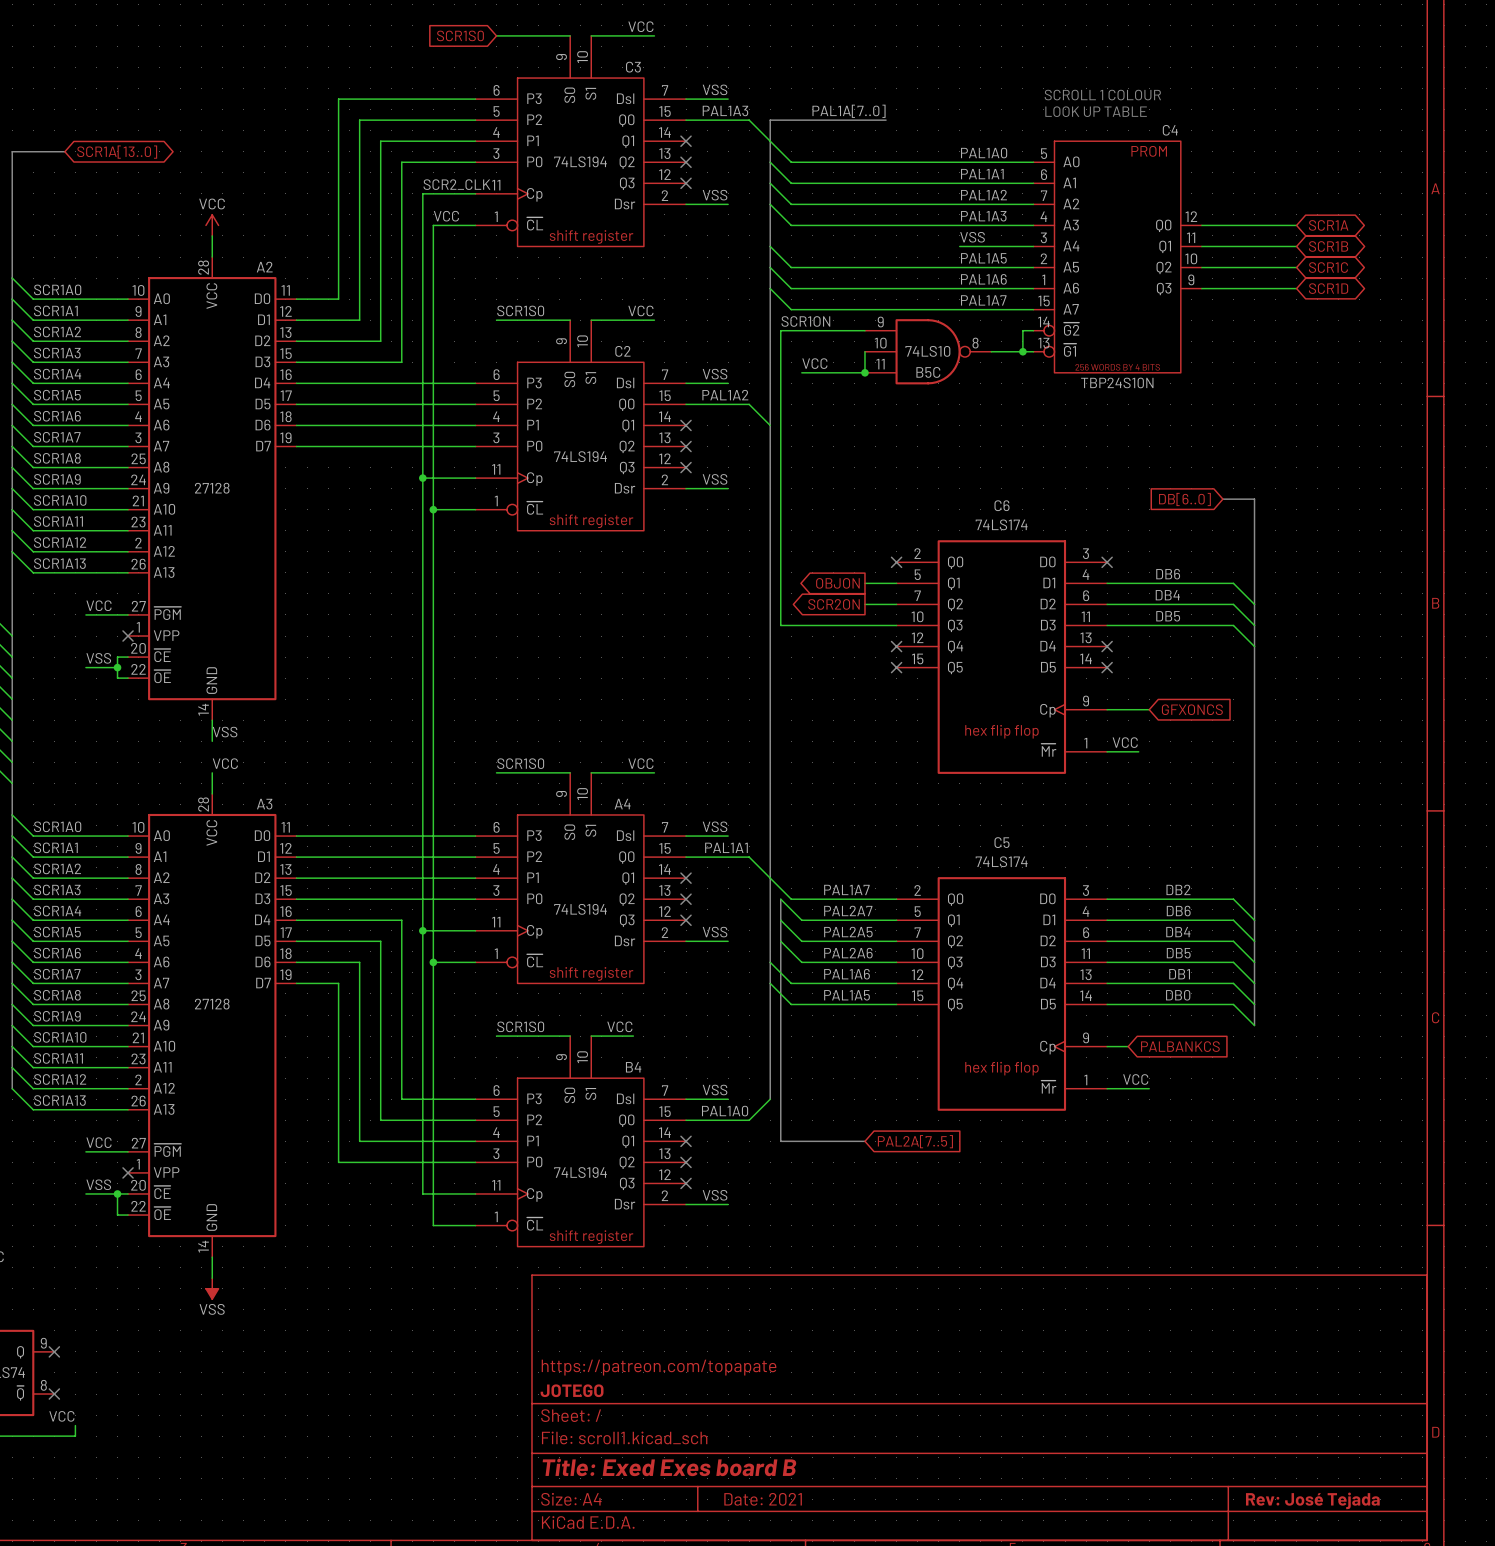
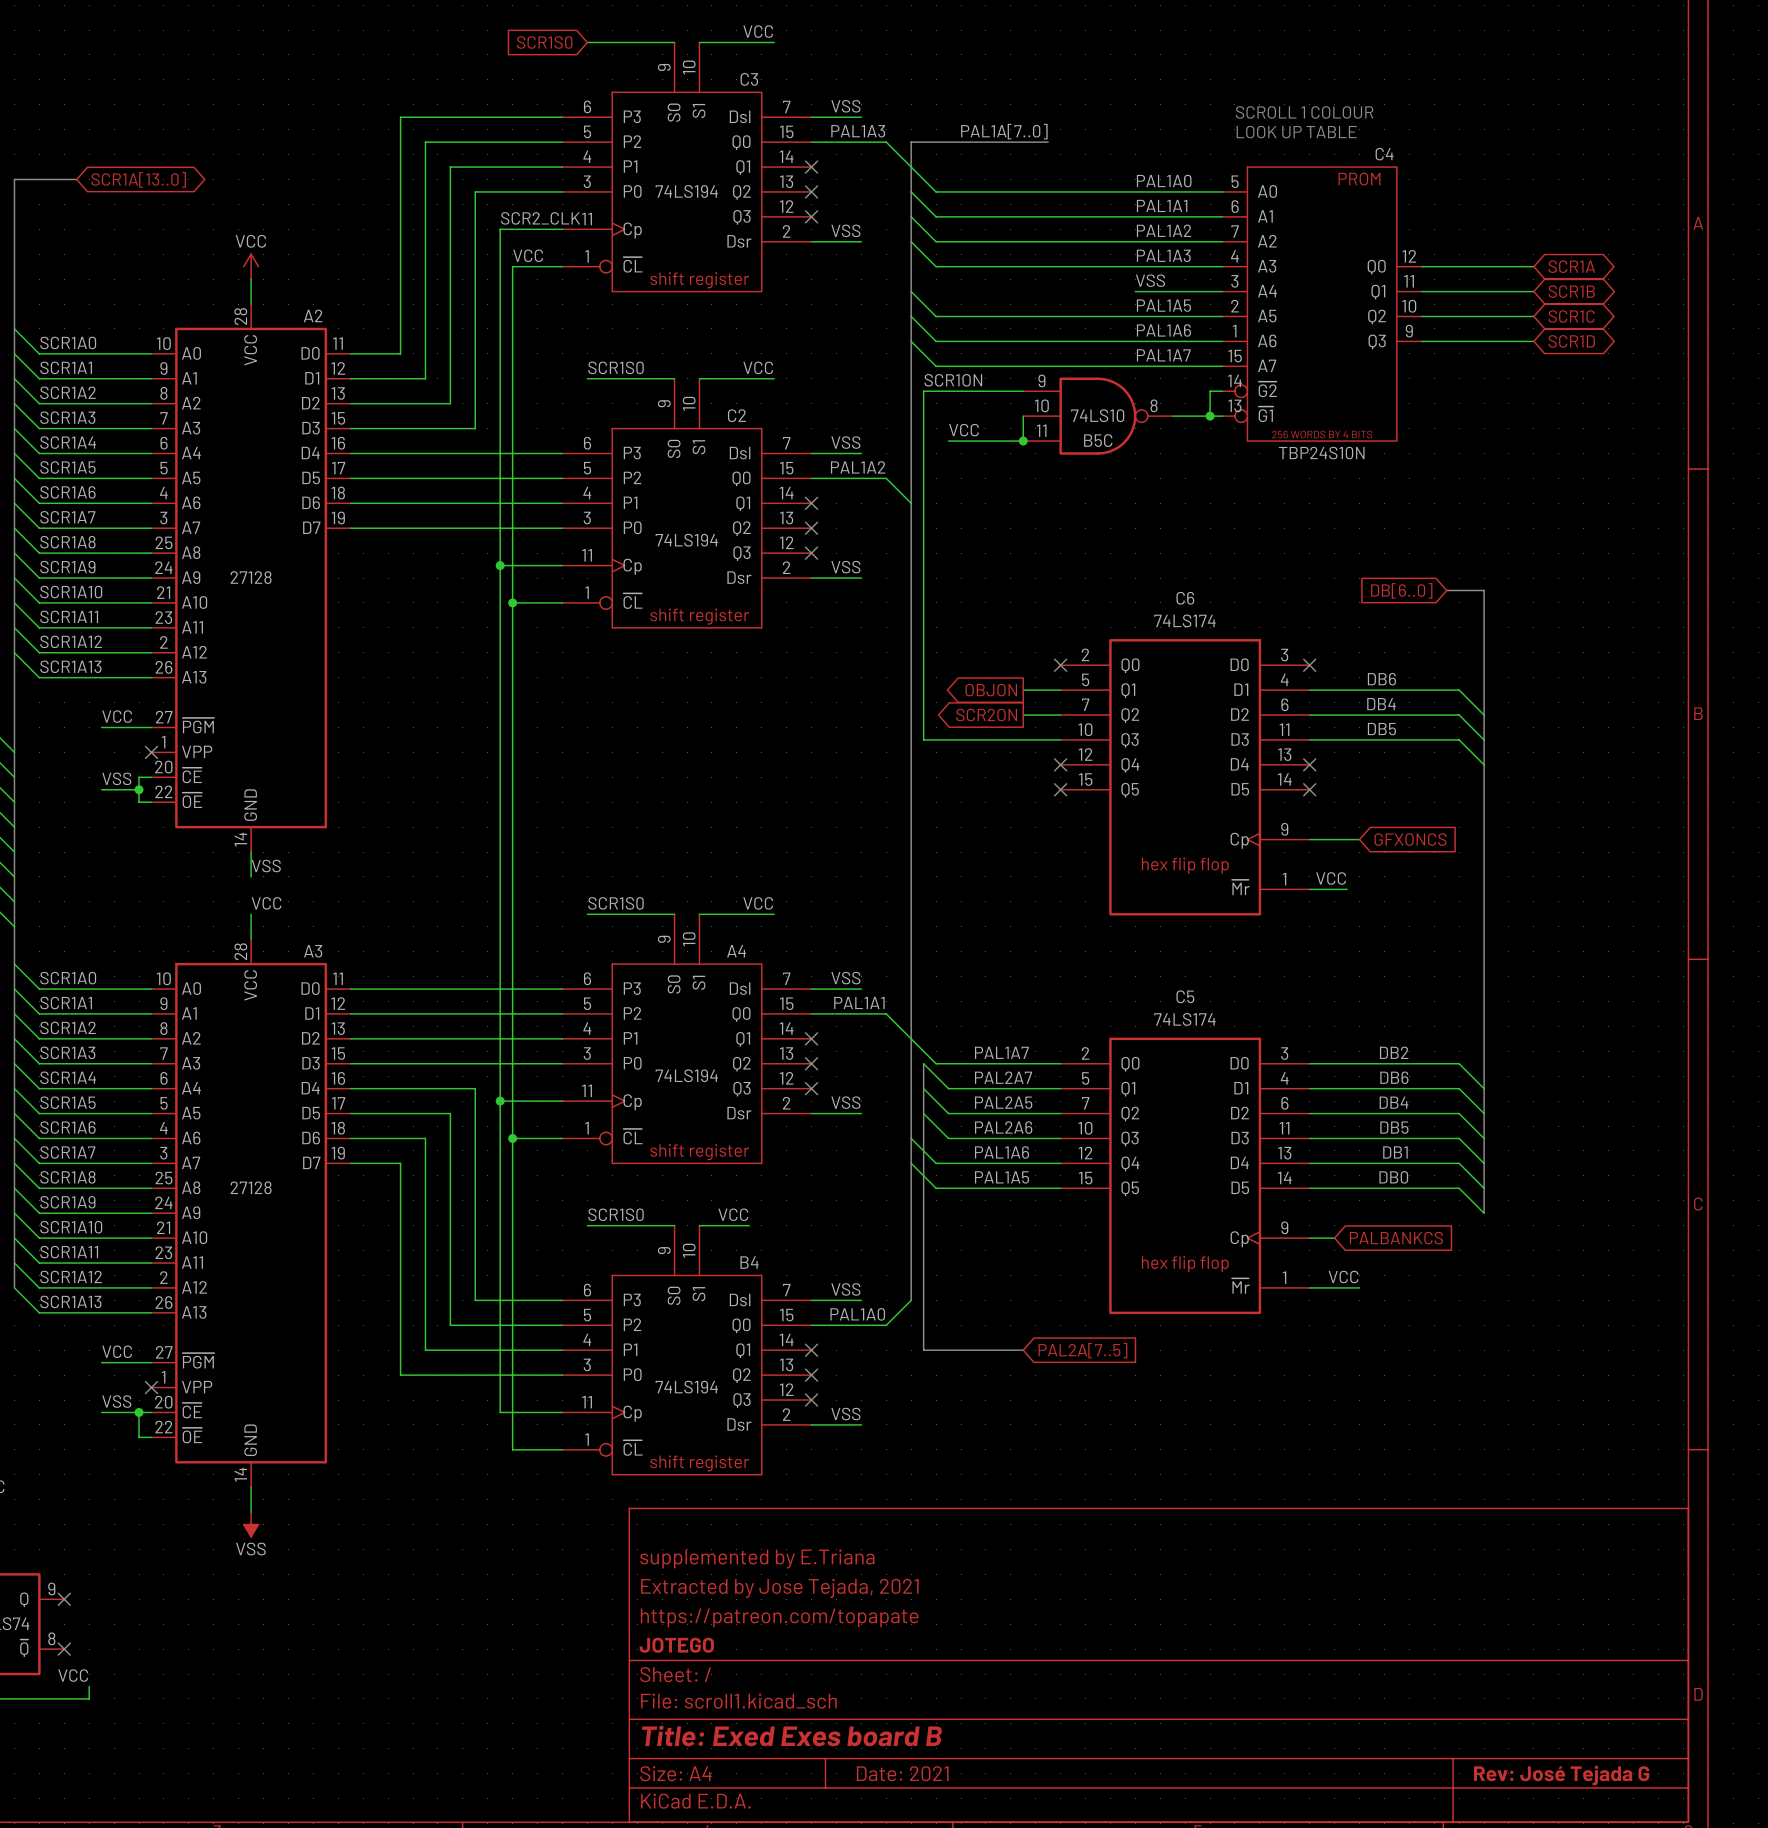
title block: none -> supplemented by E.Triana (757, 1558)
title block: none -> Extracted by Jose Tejada, 2021 (779, 1588)
title block: Rev: José Tejada (1312, 1500) -> Rev: José Tejada G (1561, 1775)

